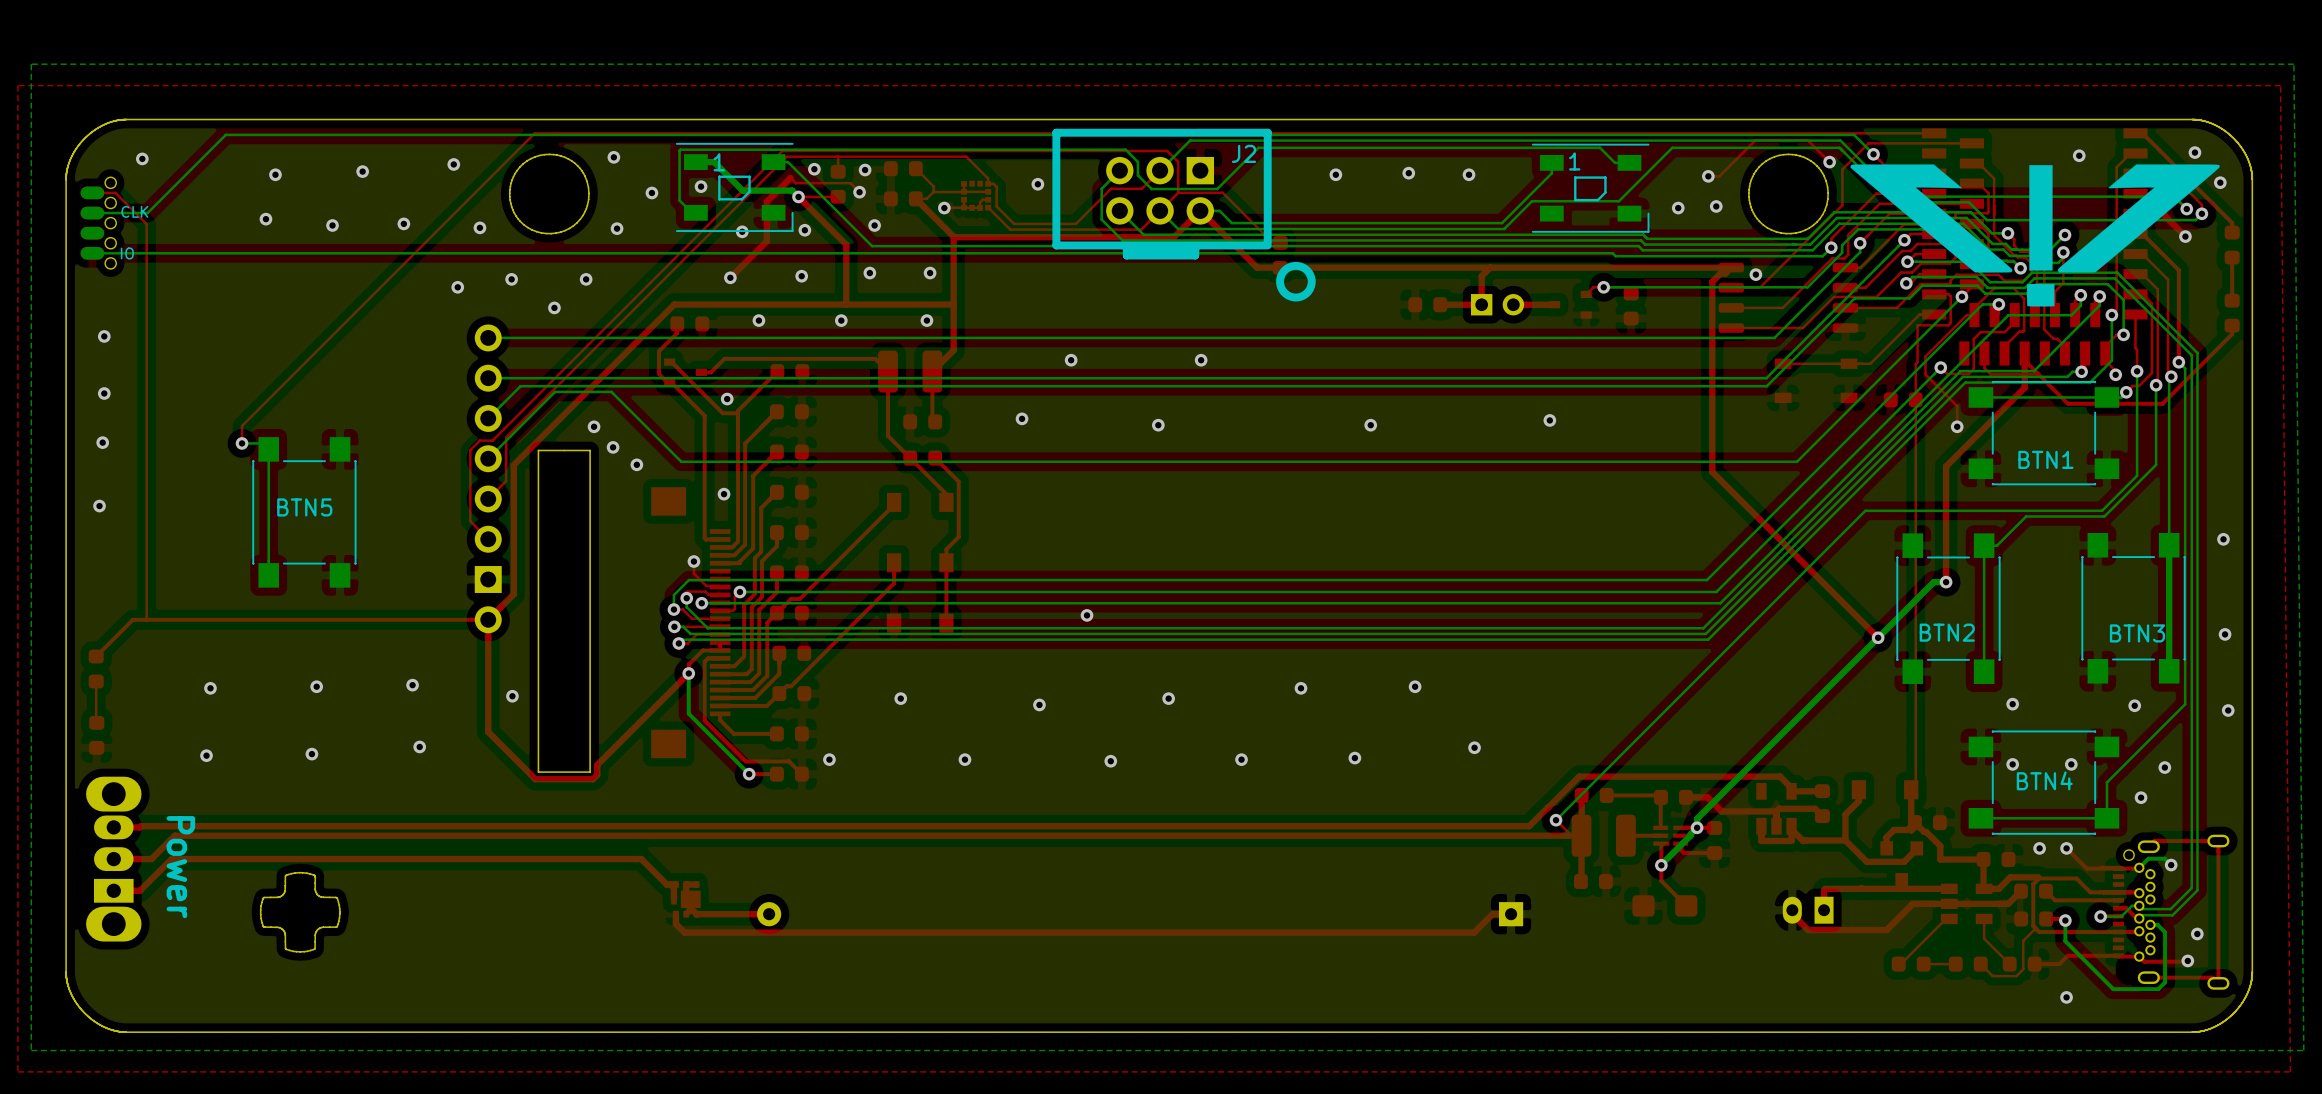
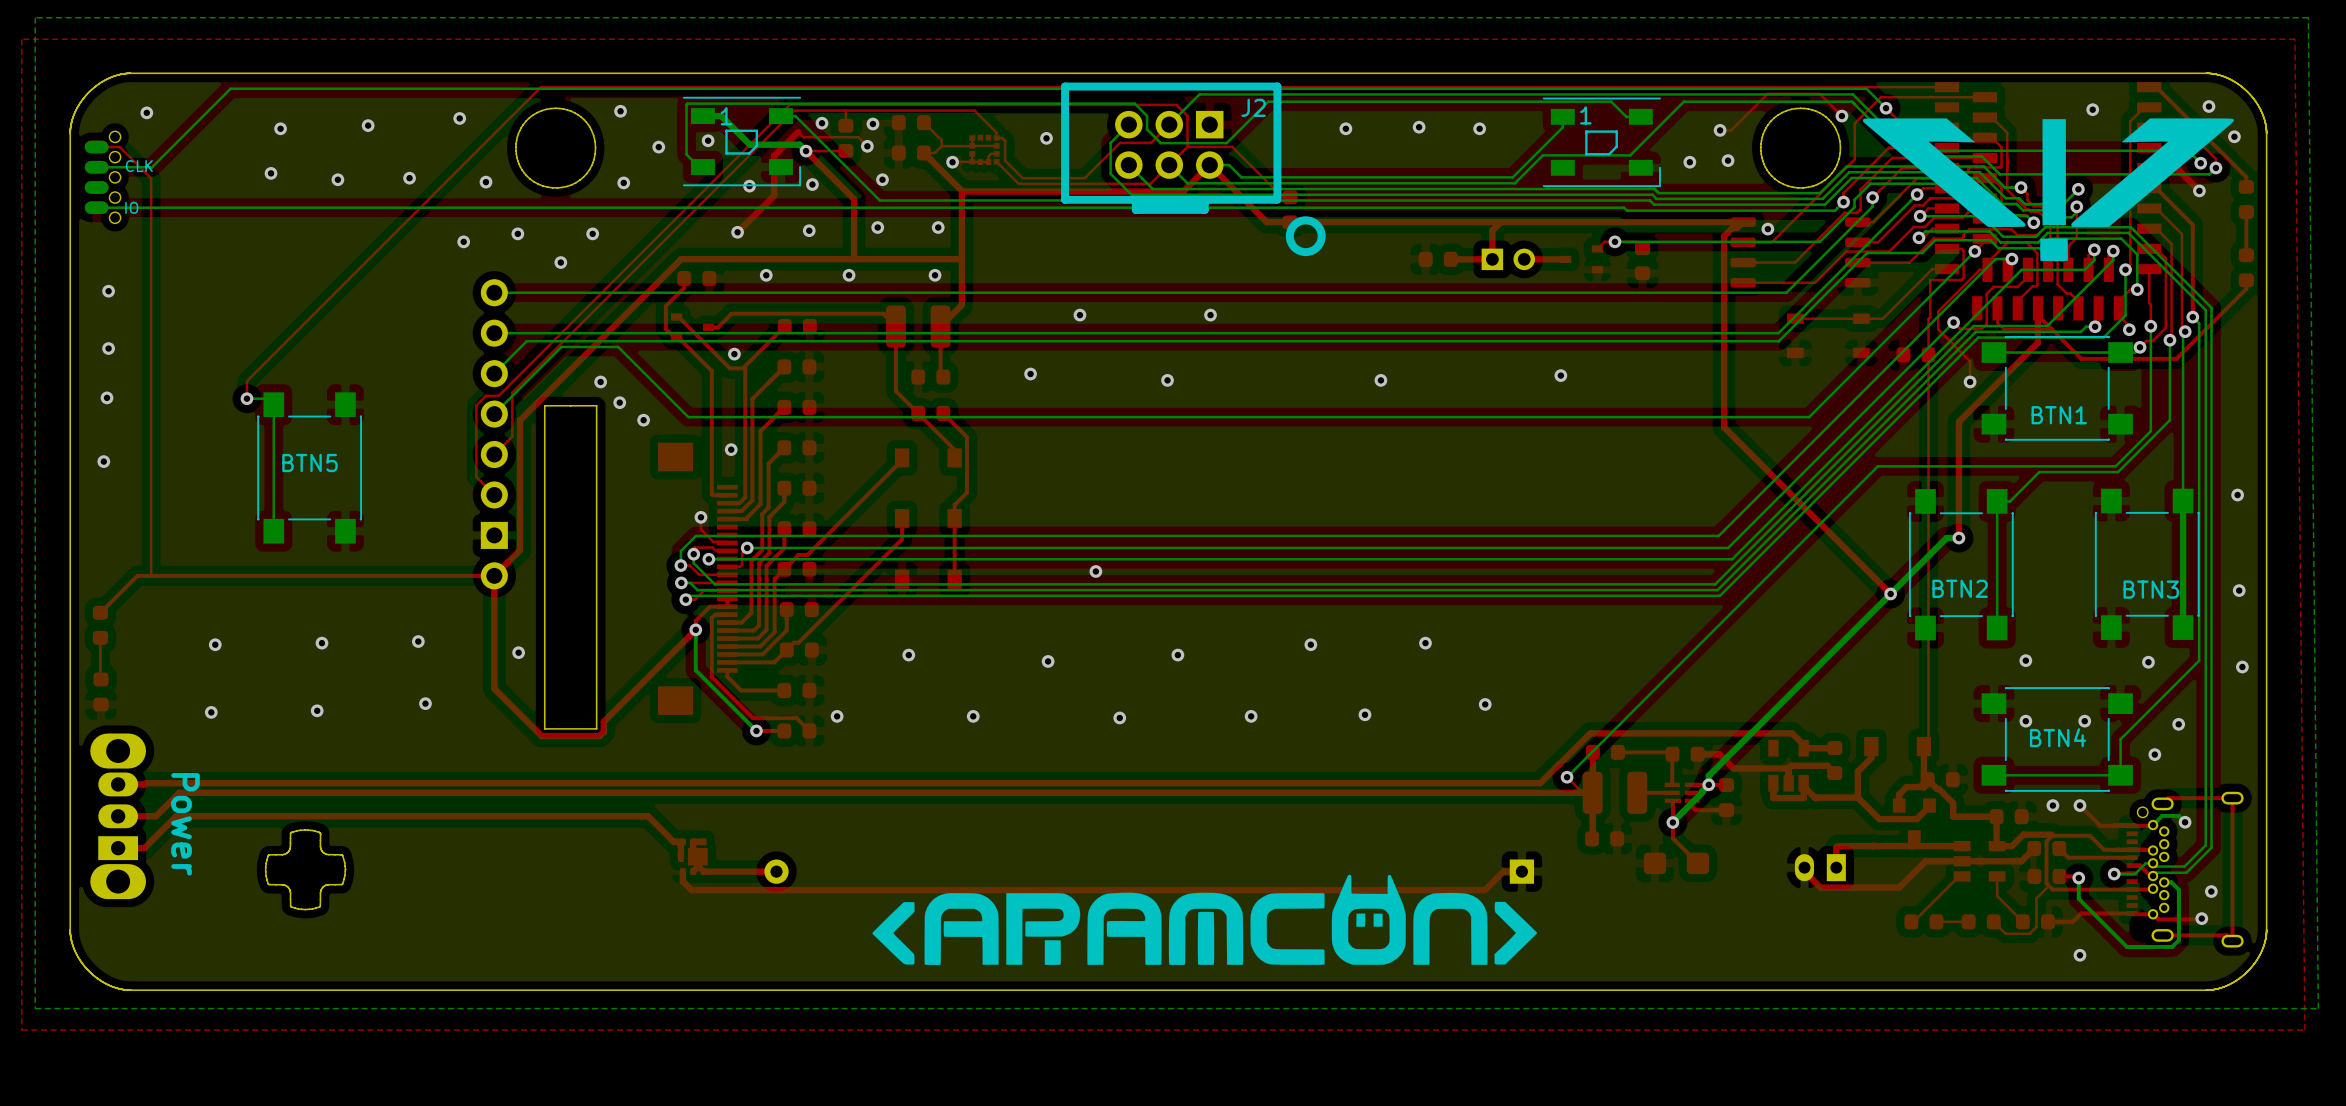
drawing shape: [65, 118, 2254, 1033] -> [69, 72, 2268, 991]

